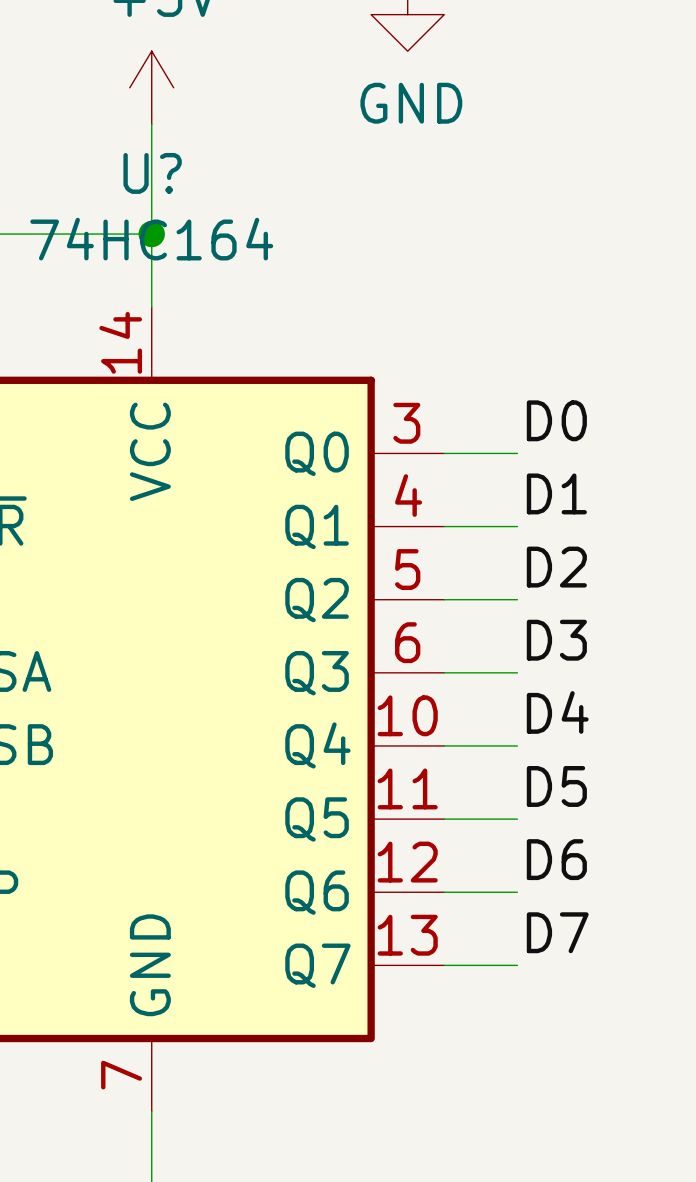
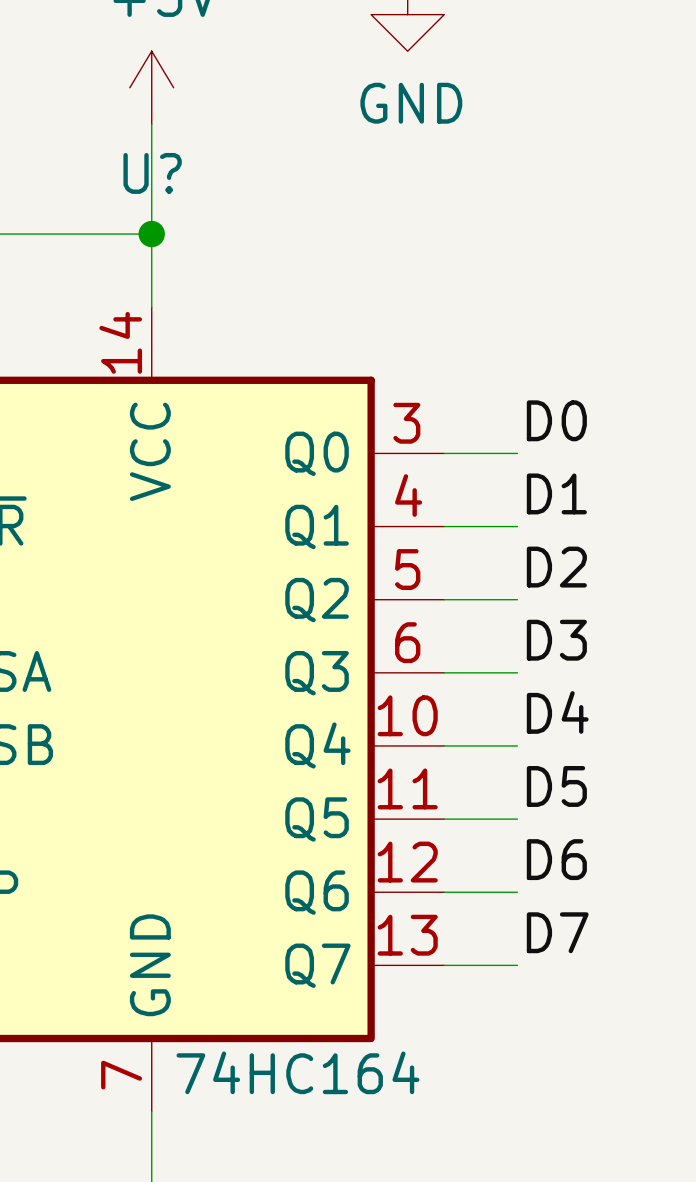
U? value position: 74HC164 (151, 239) -> 74HC164 (297, 1072)

